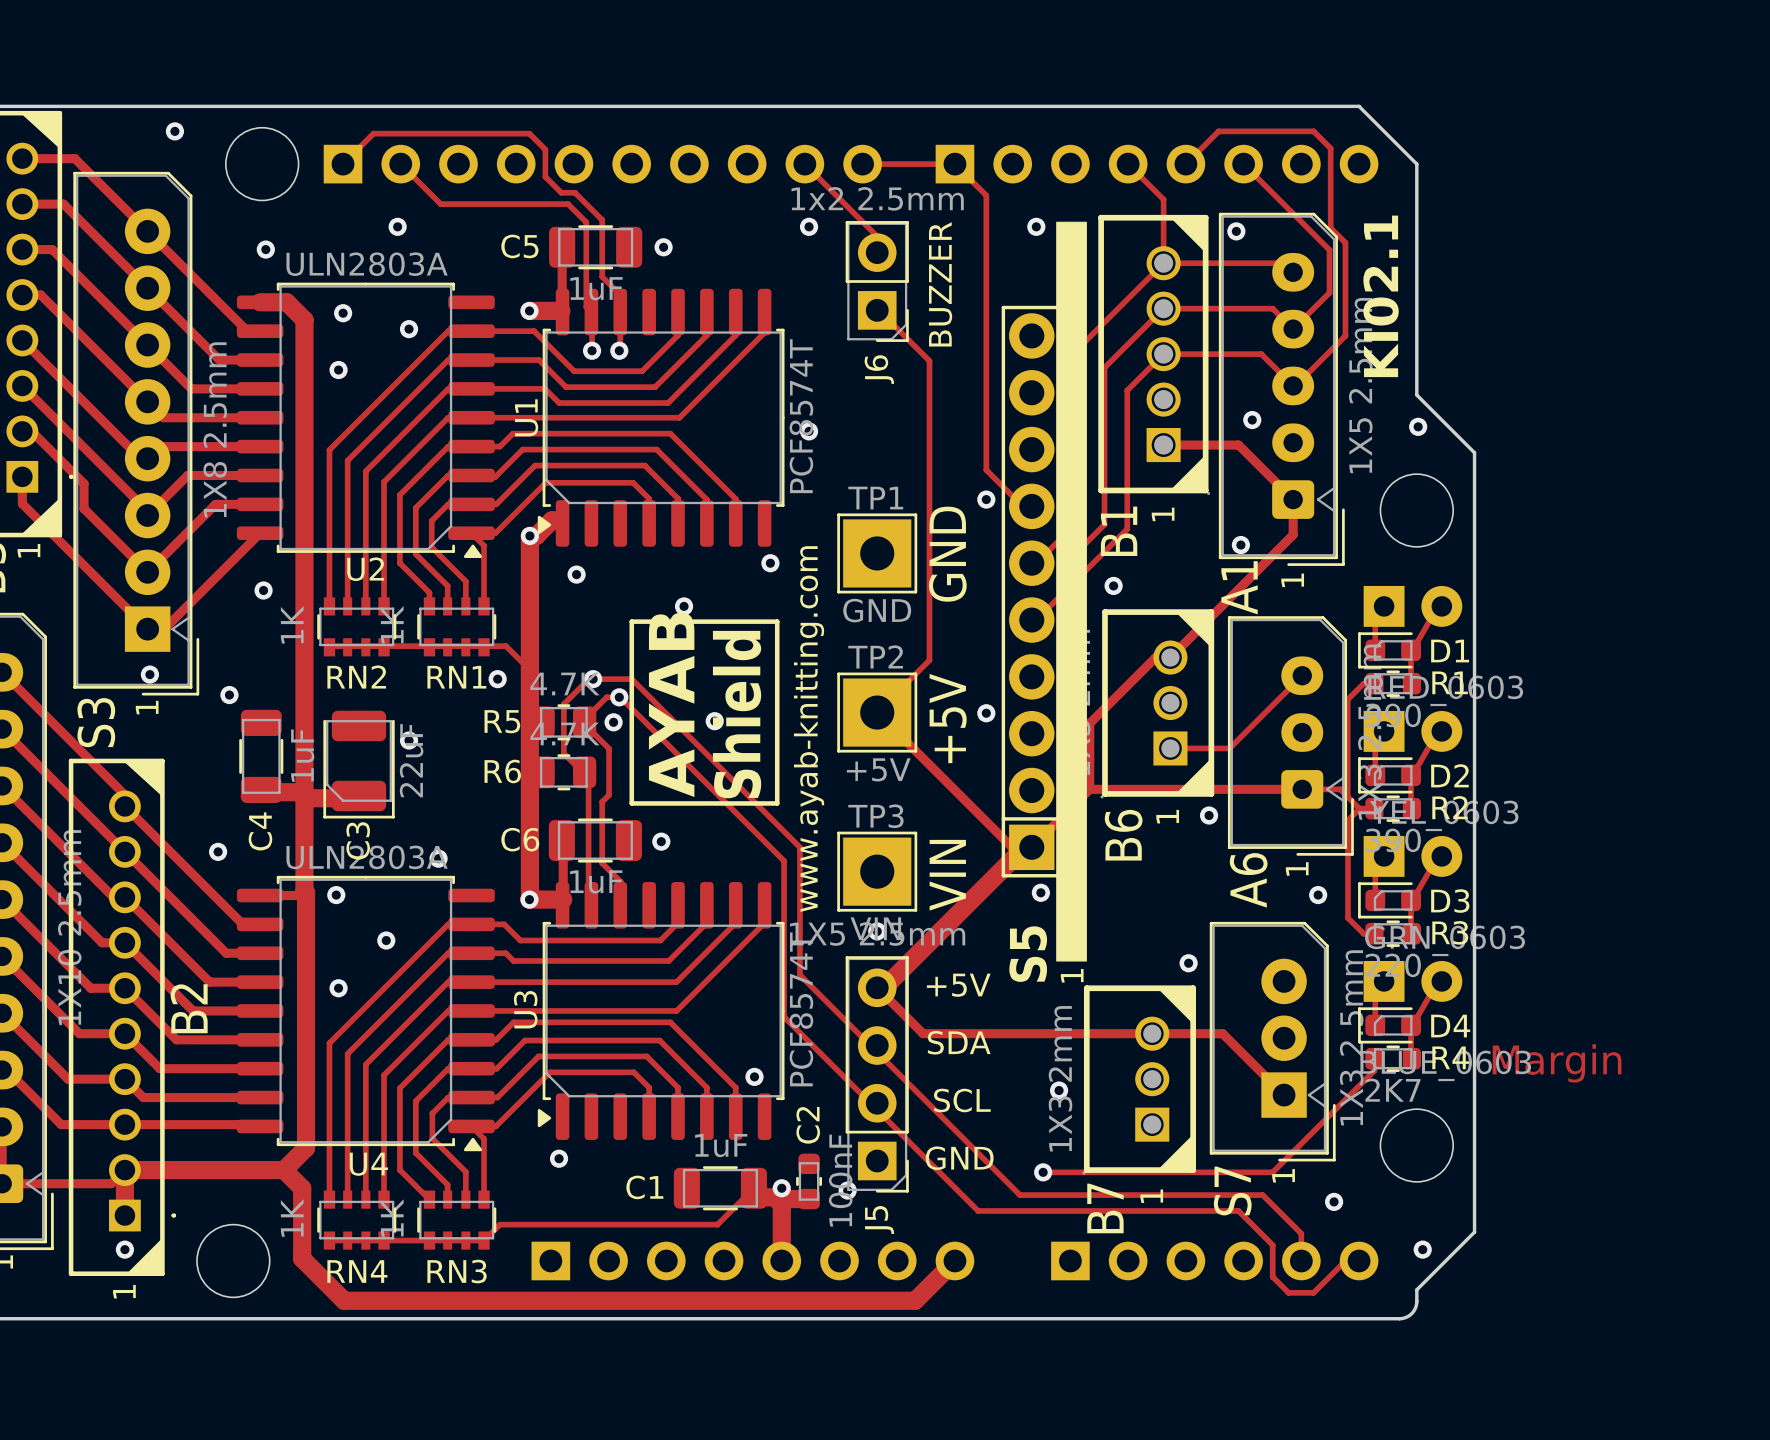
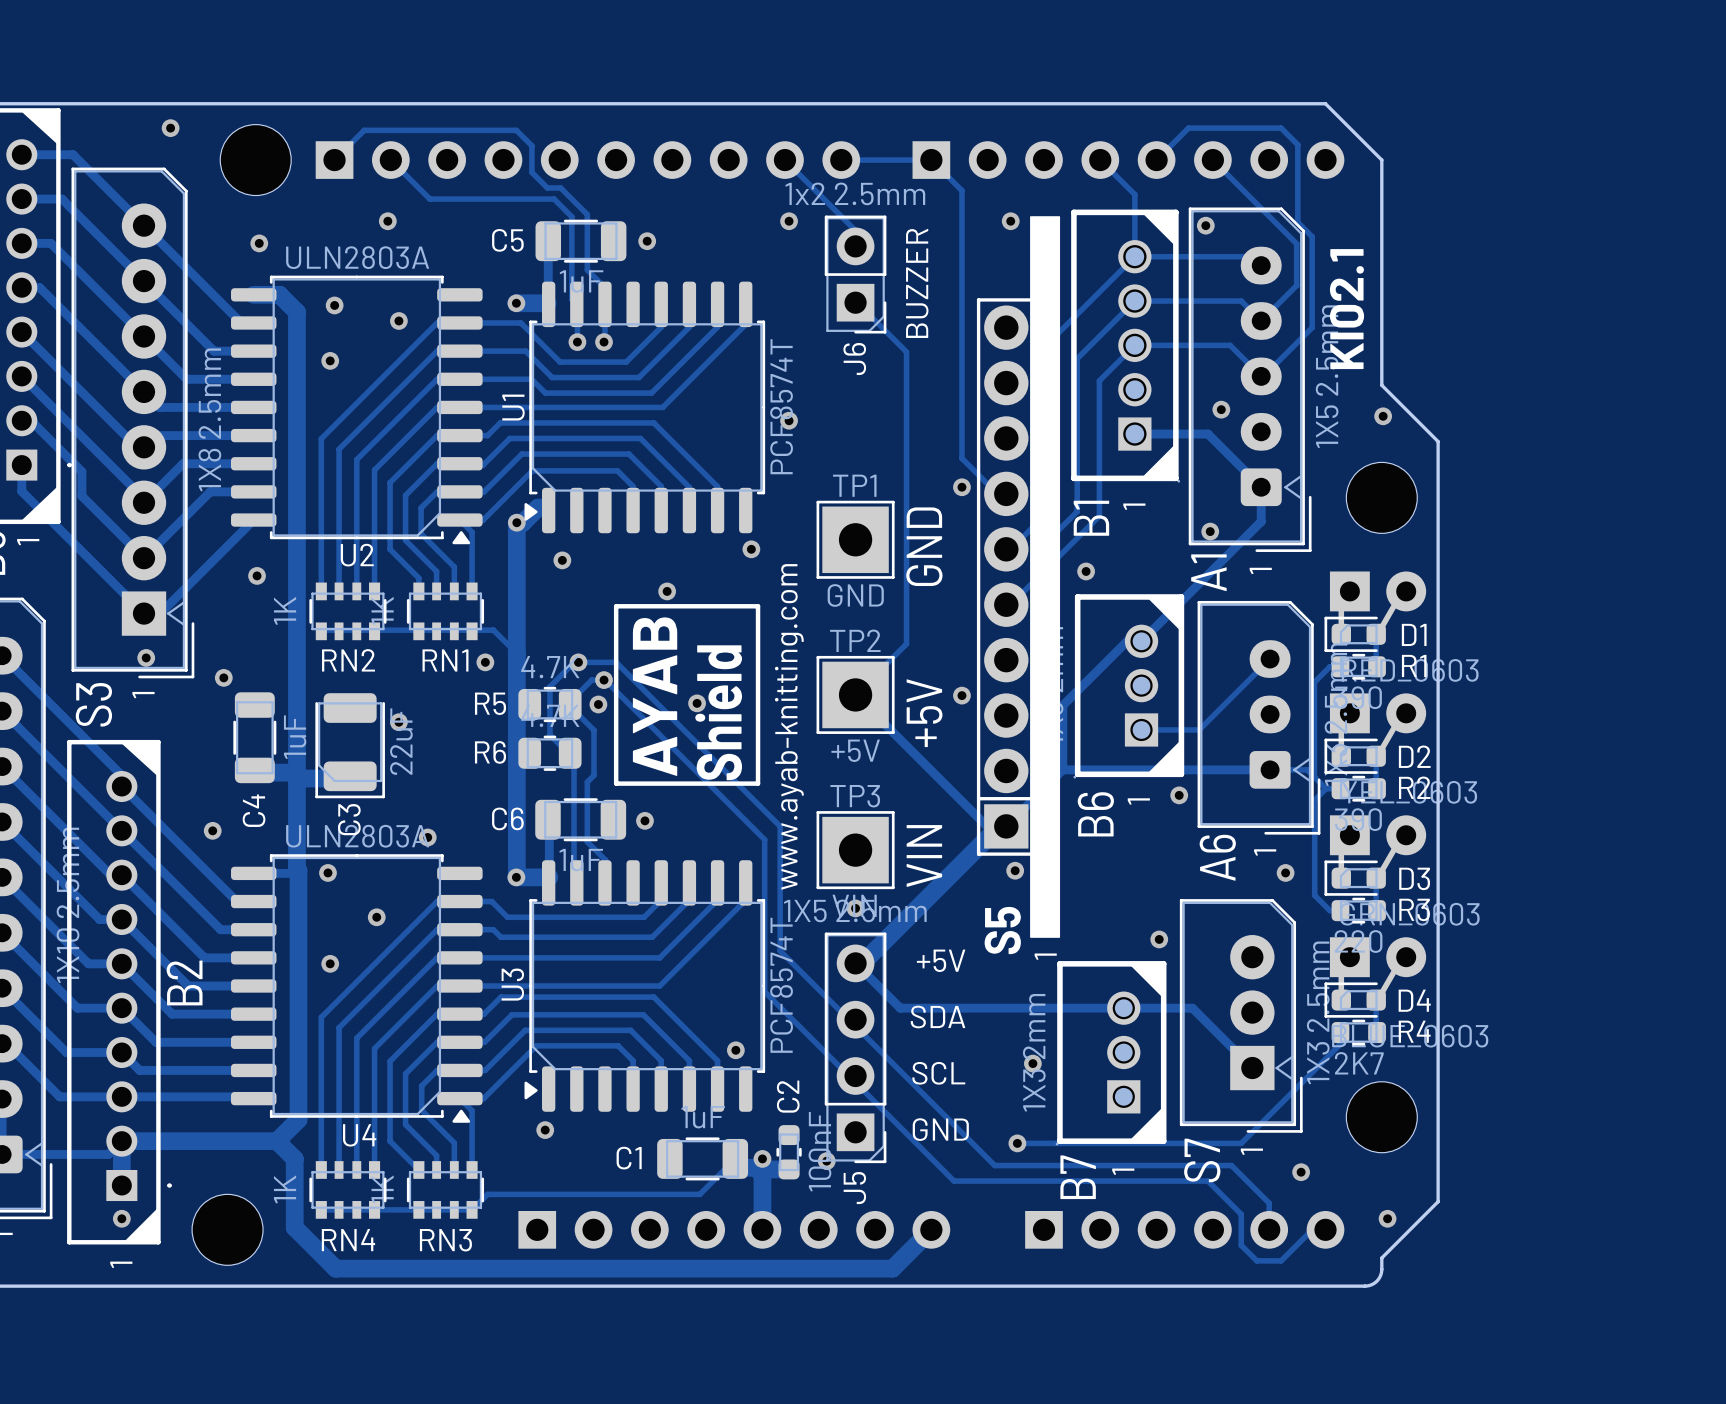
text: Margin (1557, 1063) -> none

